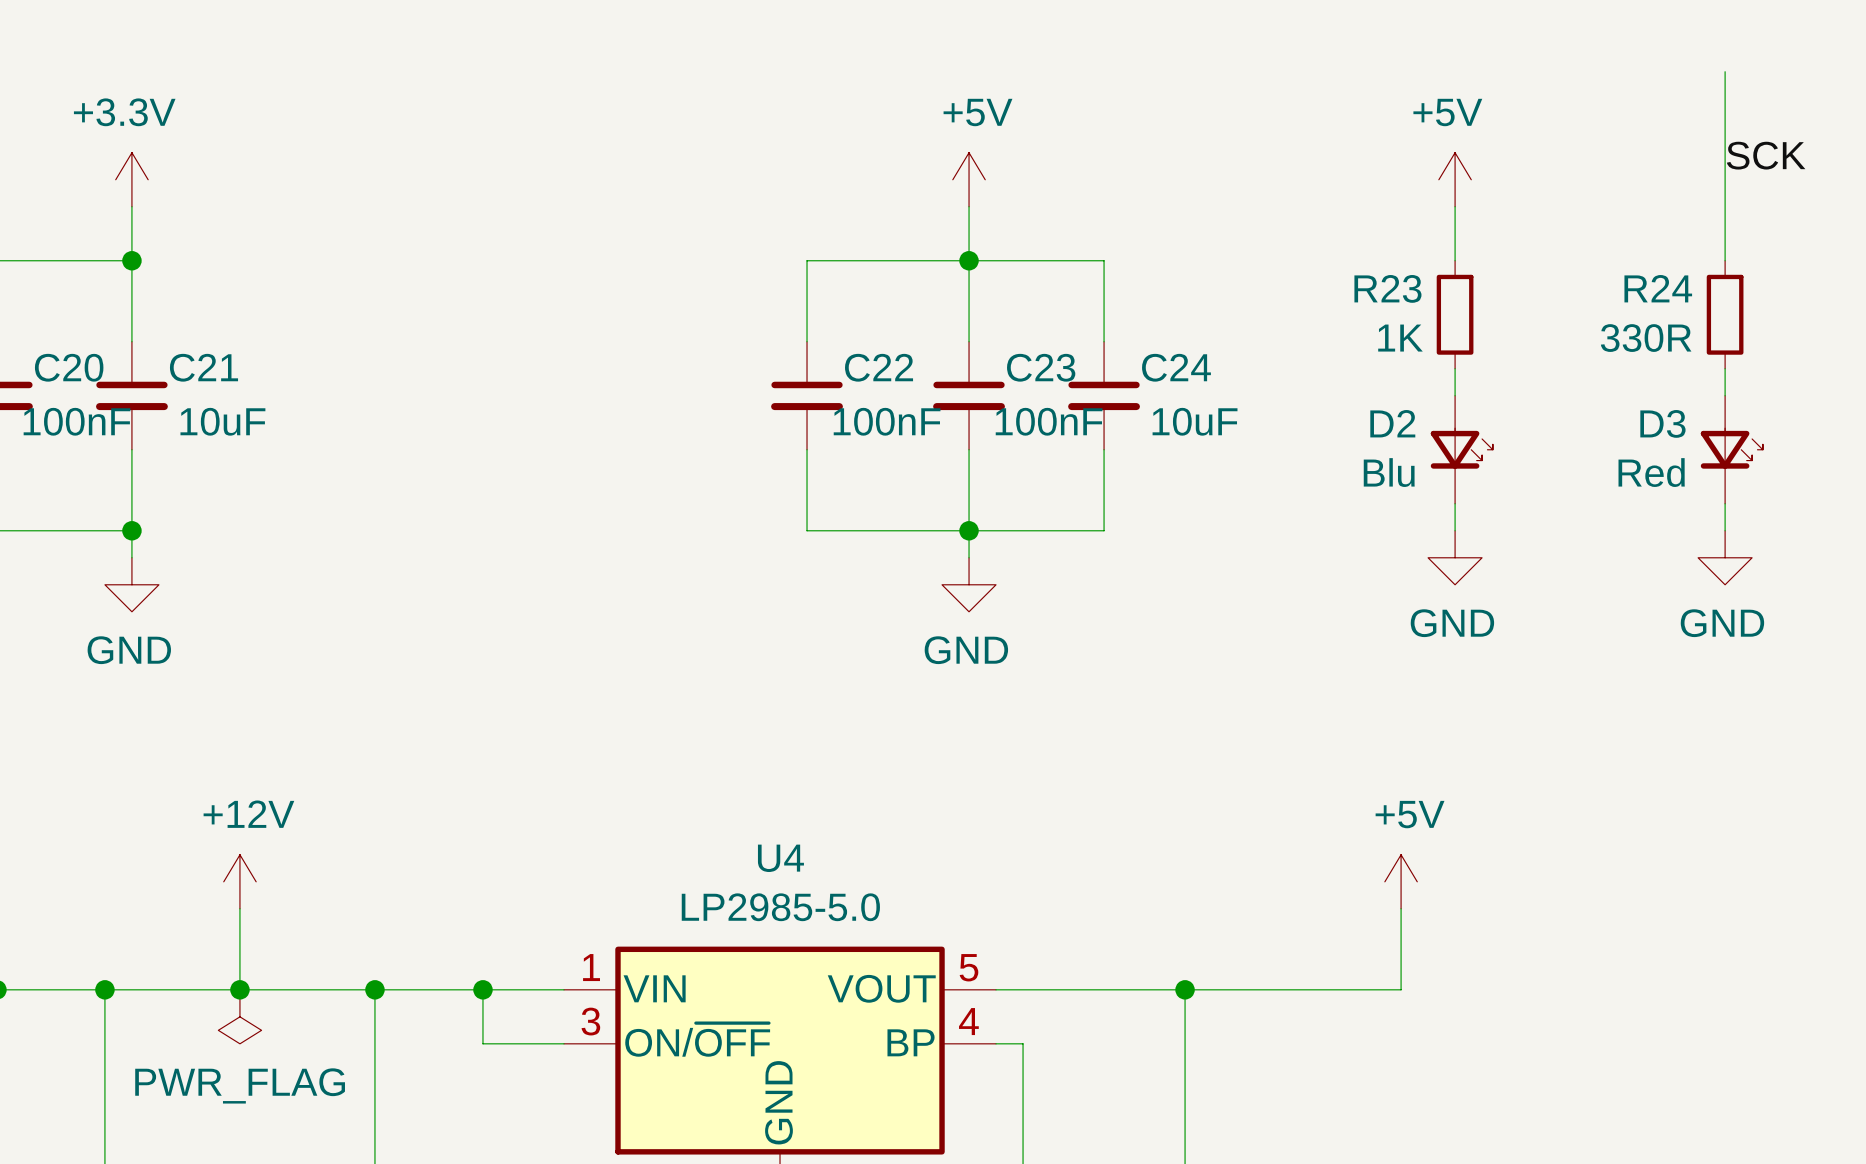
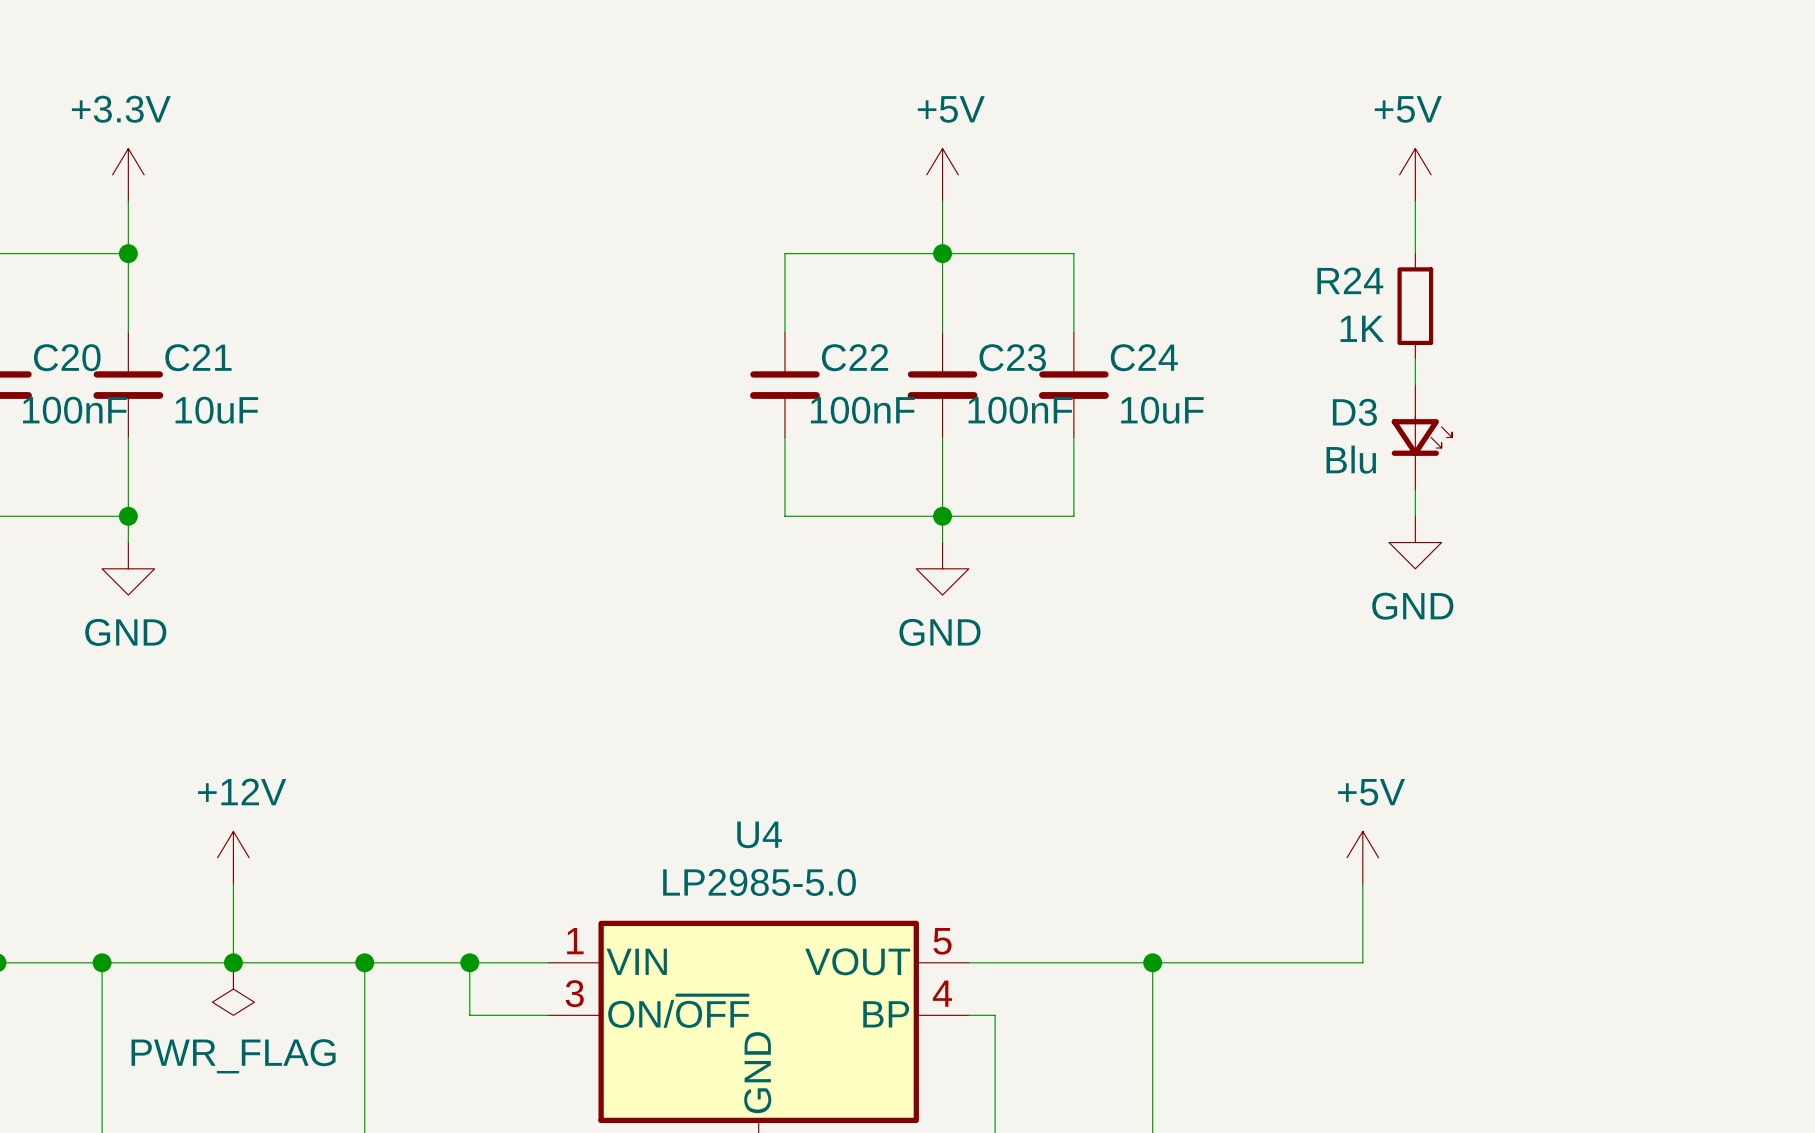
wire: (1725, 71) (1725, 260) -> none
label: SCK (1766, 155) -> none
R23 name: R23 (1387, 288) -> R24 (1350, 280)
R24: 330R (1725, 314) -> none
wire: (1725, 368) (1725, 395) -> none
D2 name: D2 (1392, 423) -> D3 (1354, 412)
D3: Red (1731, 449) -> none
wire: (1725, 503) (1725, 530) -> none
power symbol: GND (1725, 557) -> none

